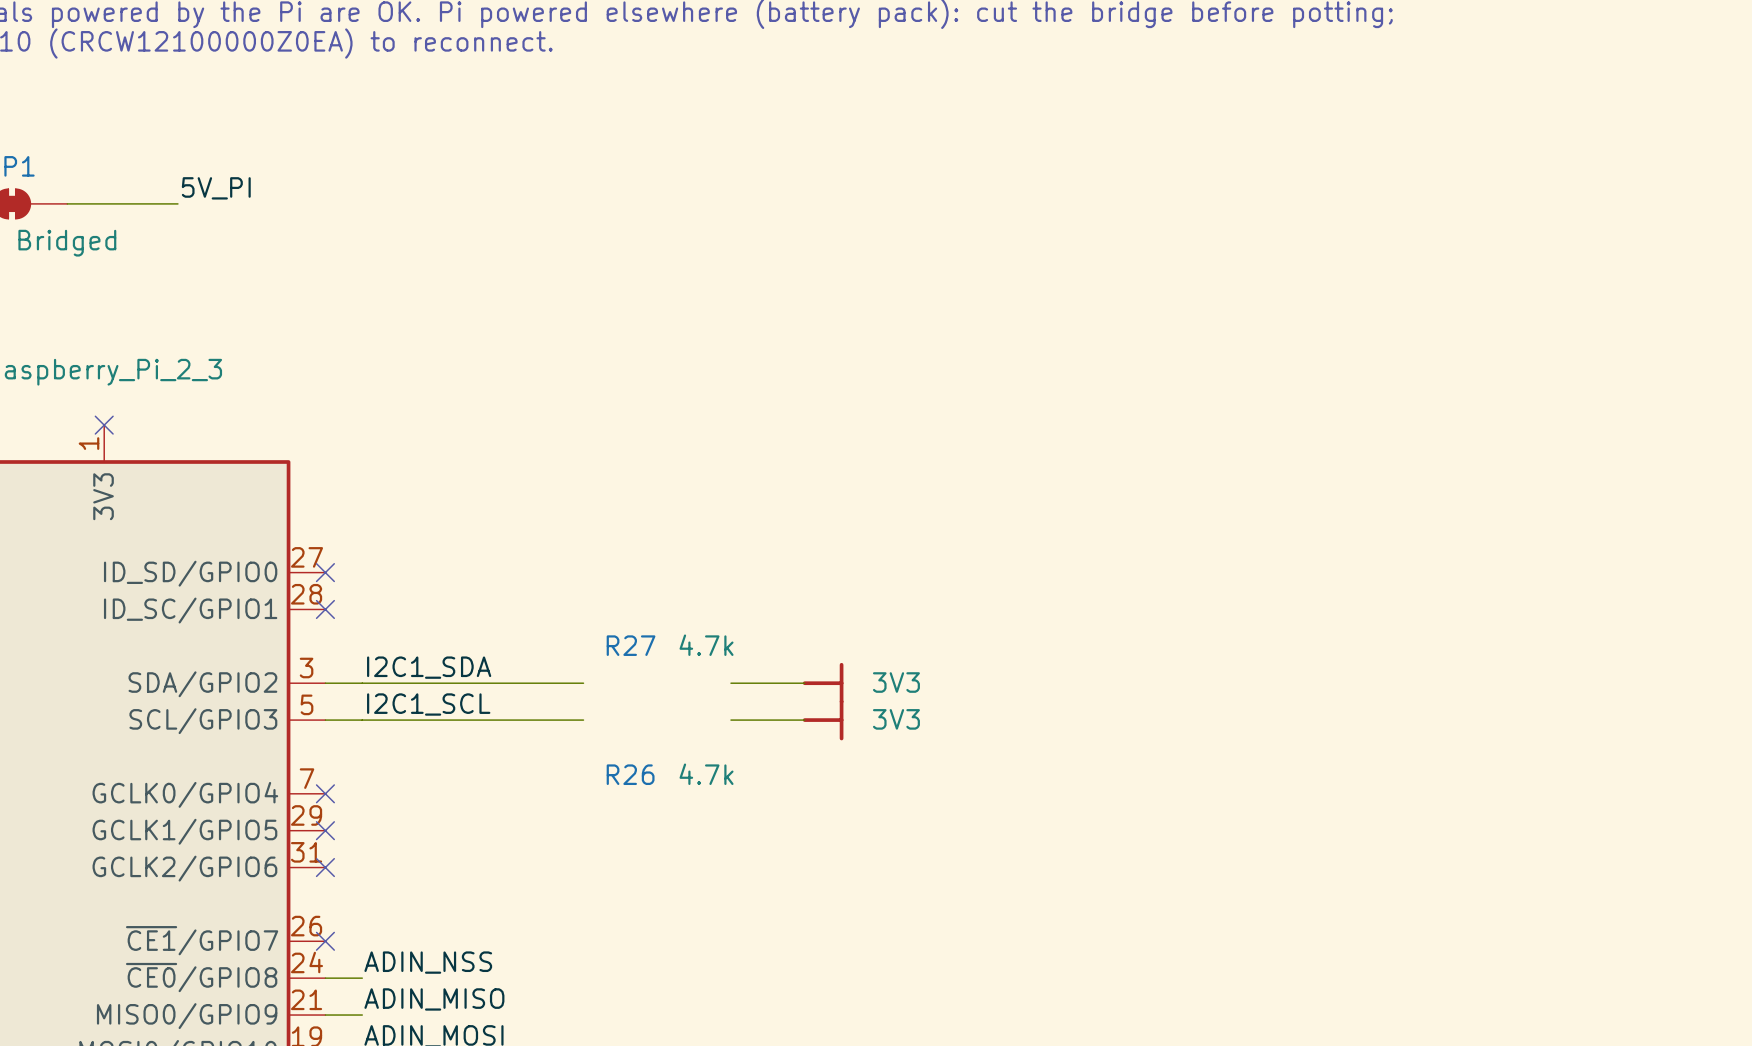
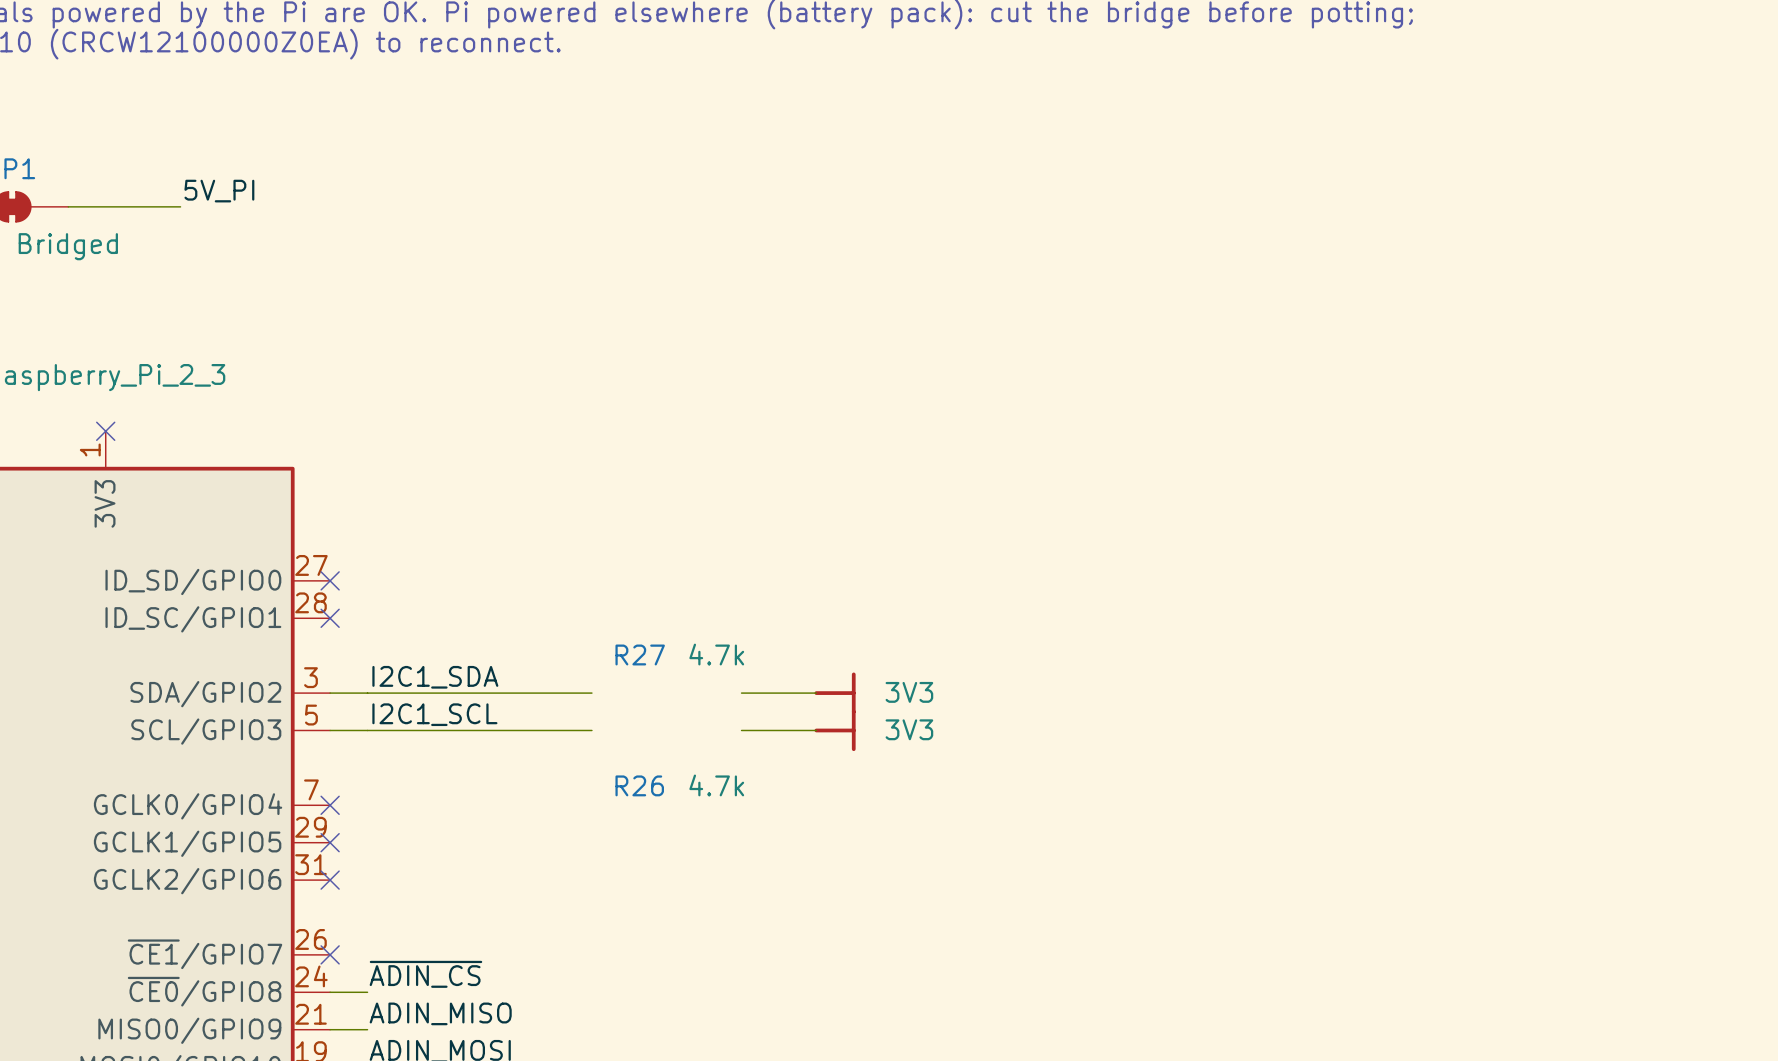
label: ADIN_NSS (428, 962) -> ~{ADIN_CS} (425, 974)

